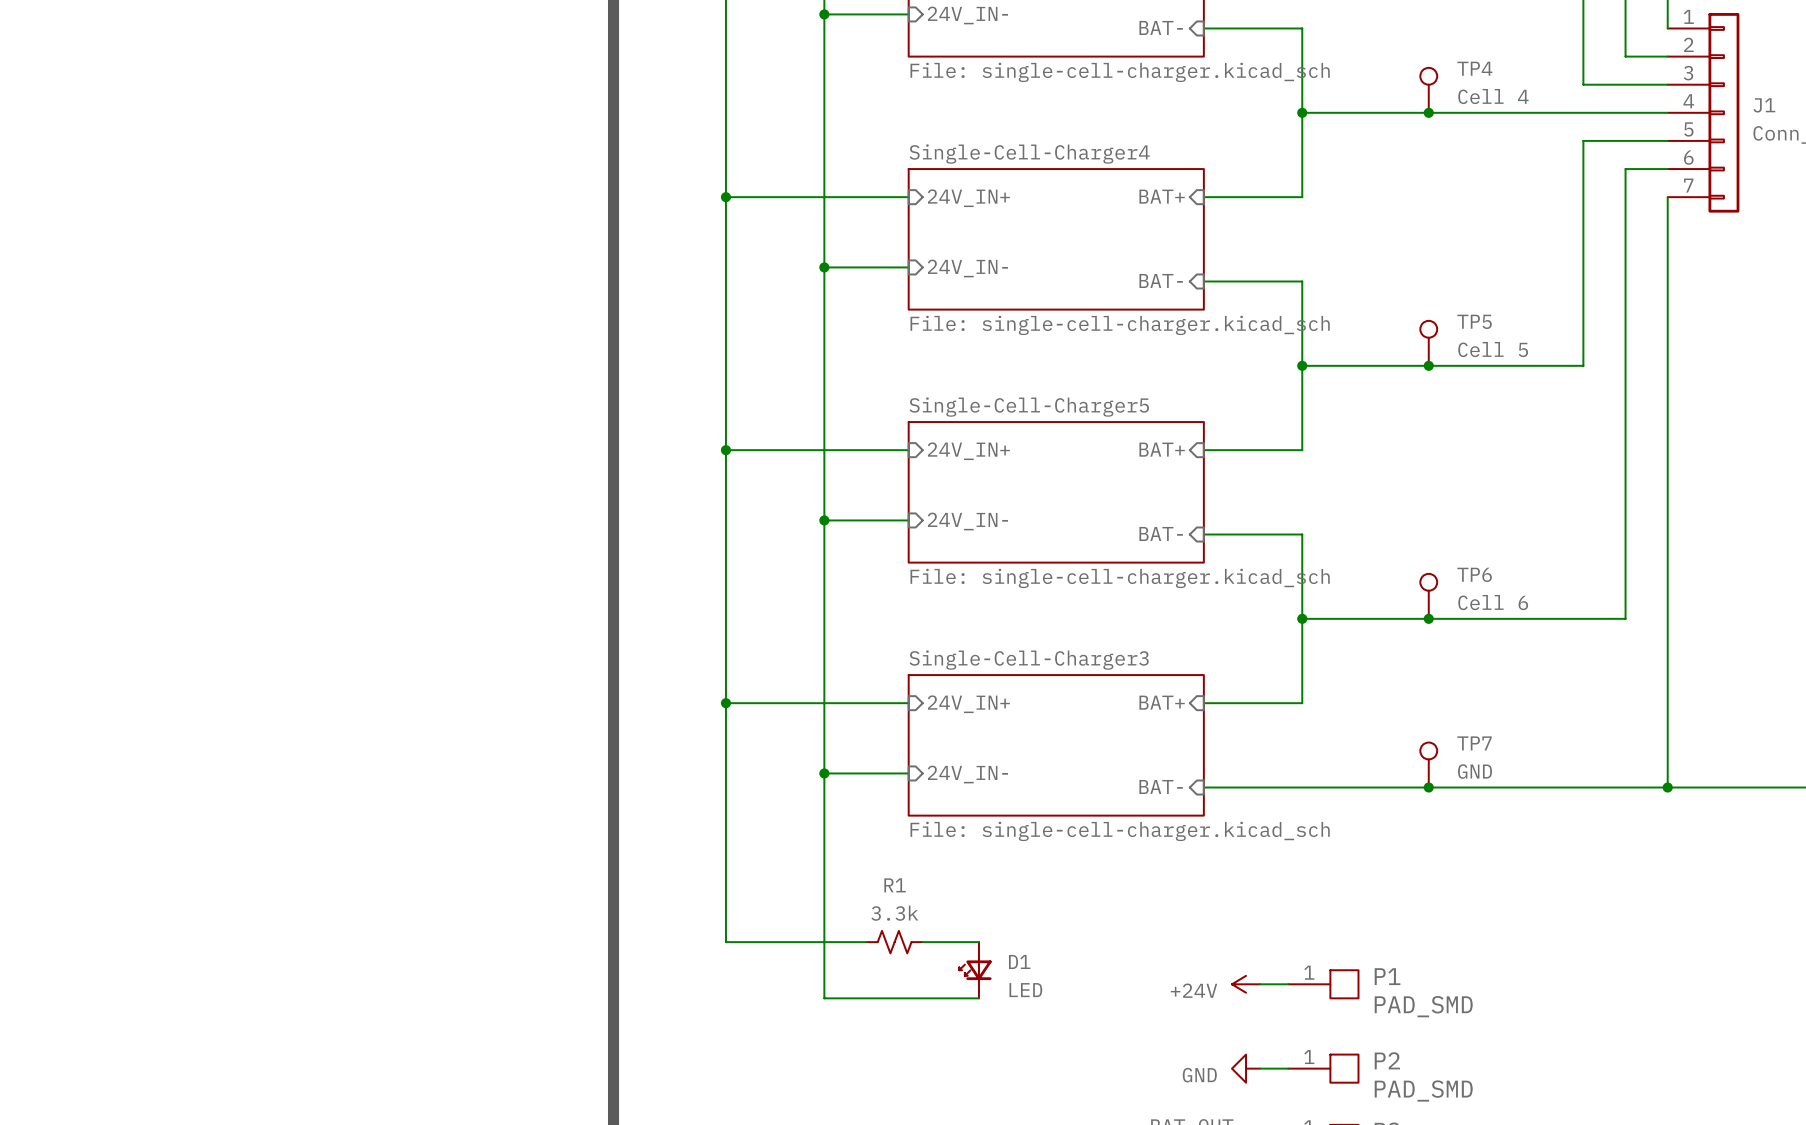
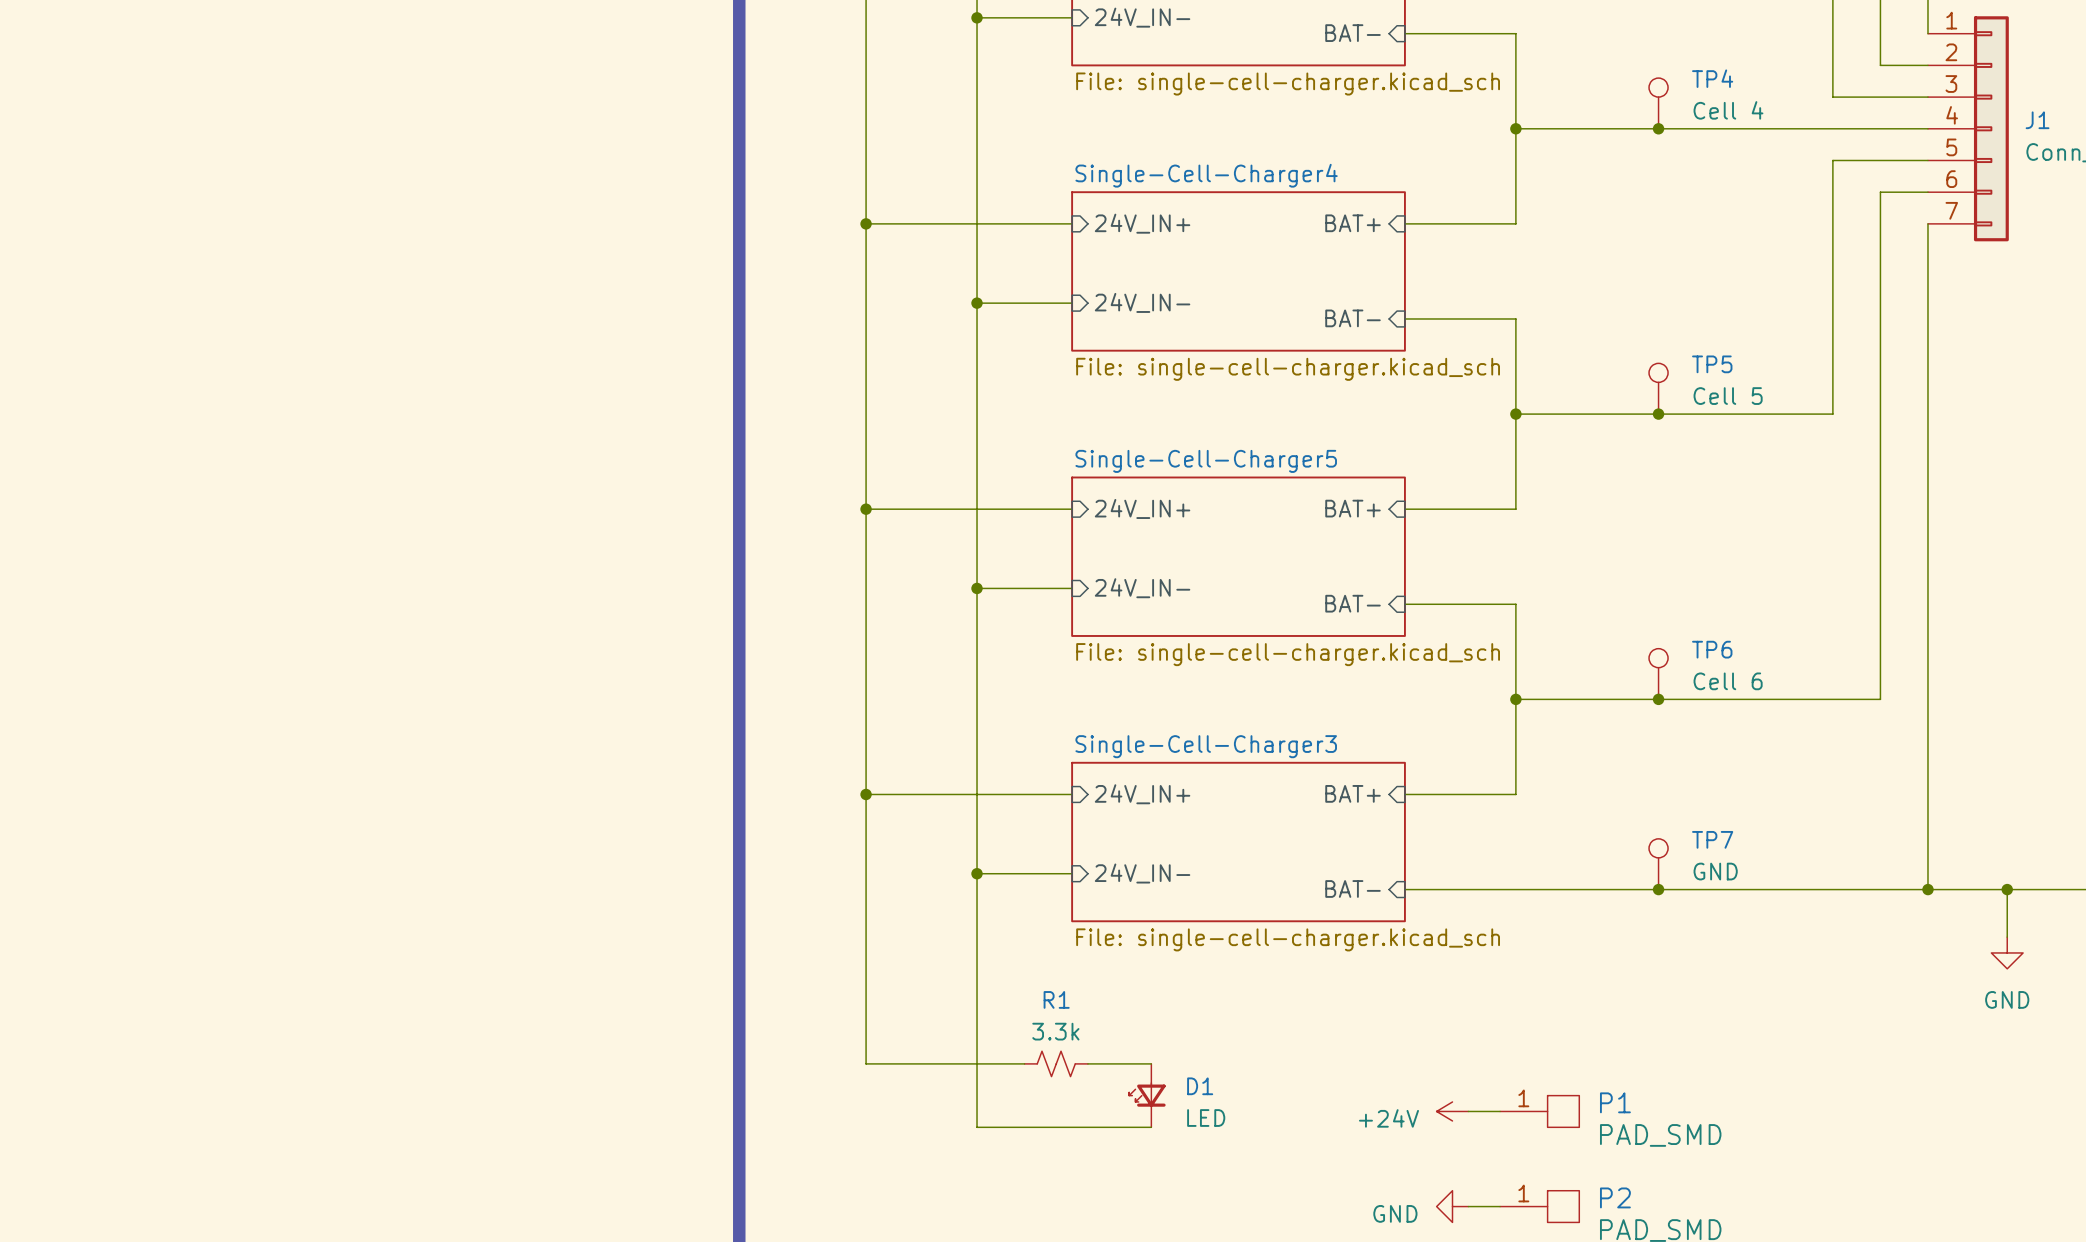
wire: none -> (2007, 889) (2007, 937)
junction: none -> (2007, 889)
power symbol: none -> GND (2007, 952)

